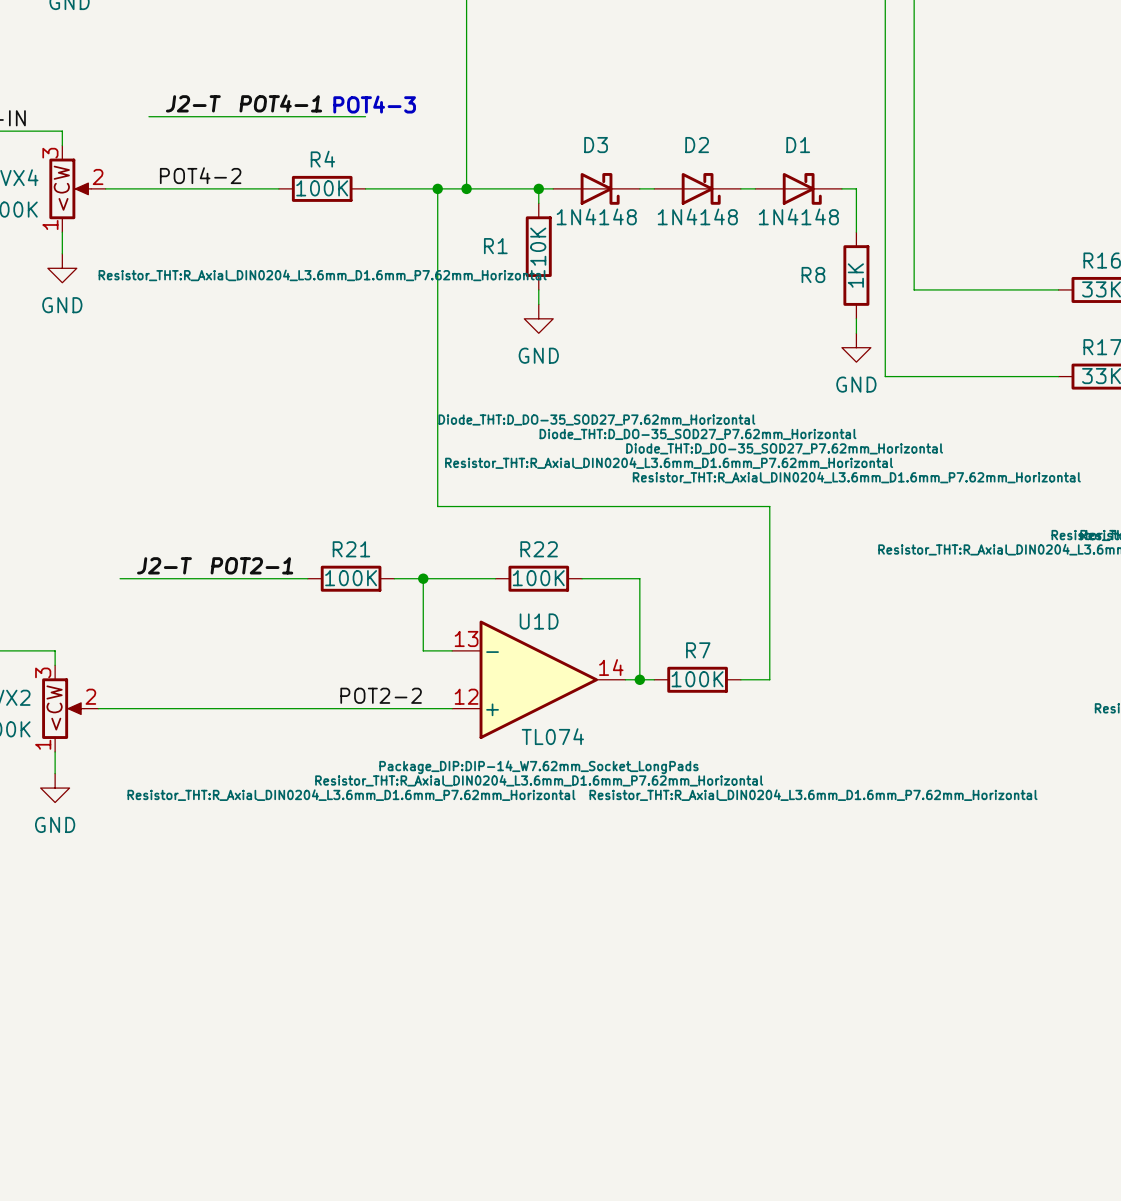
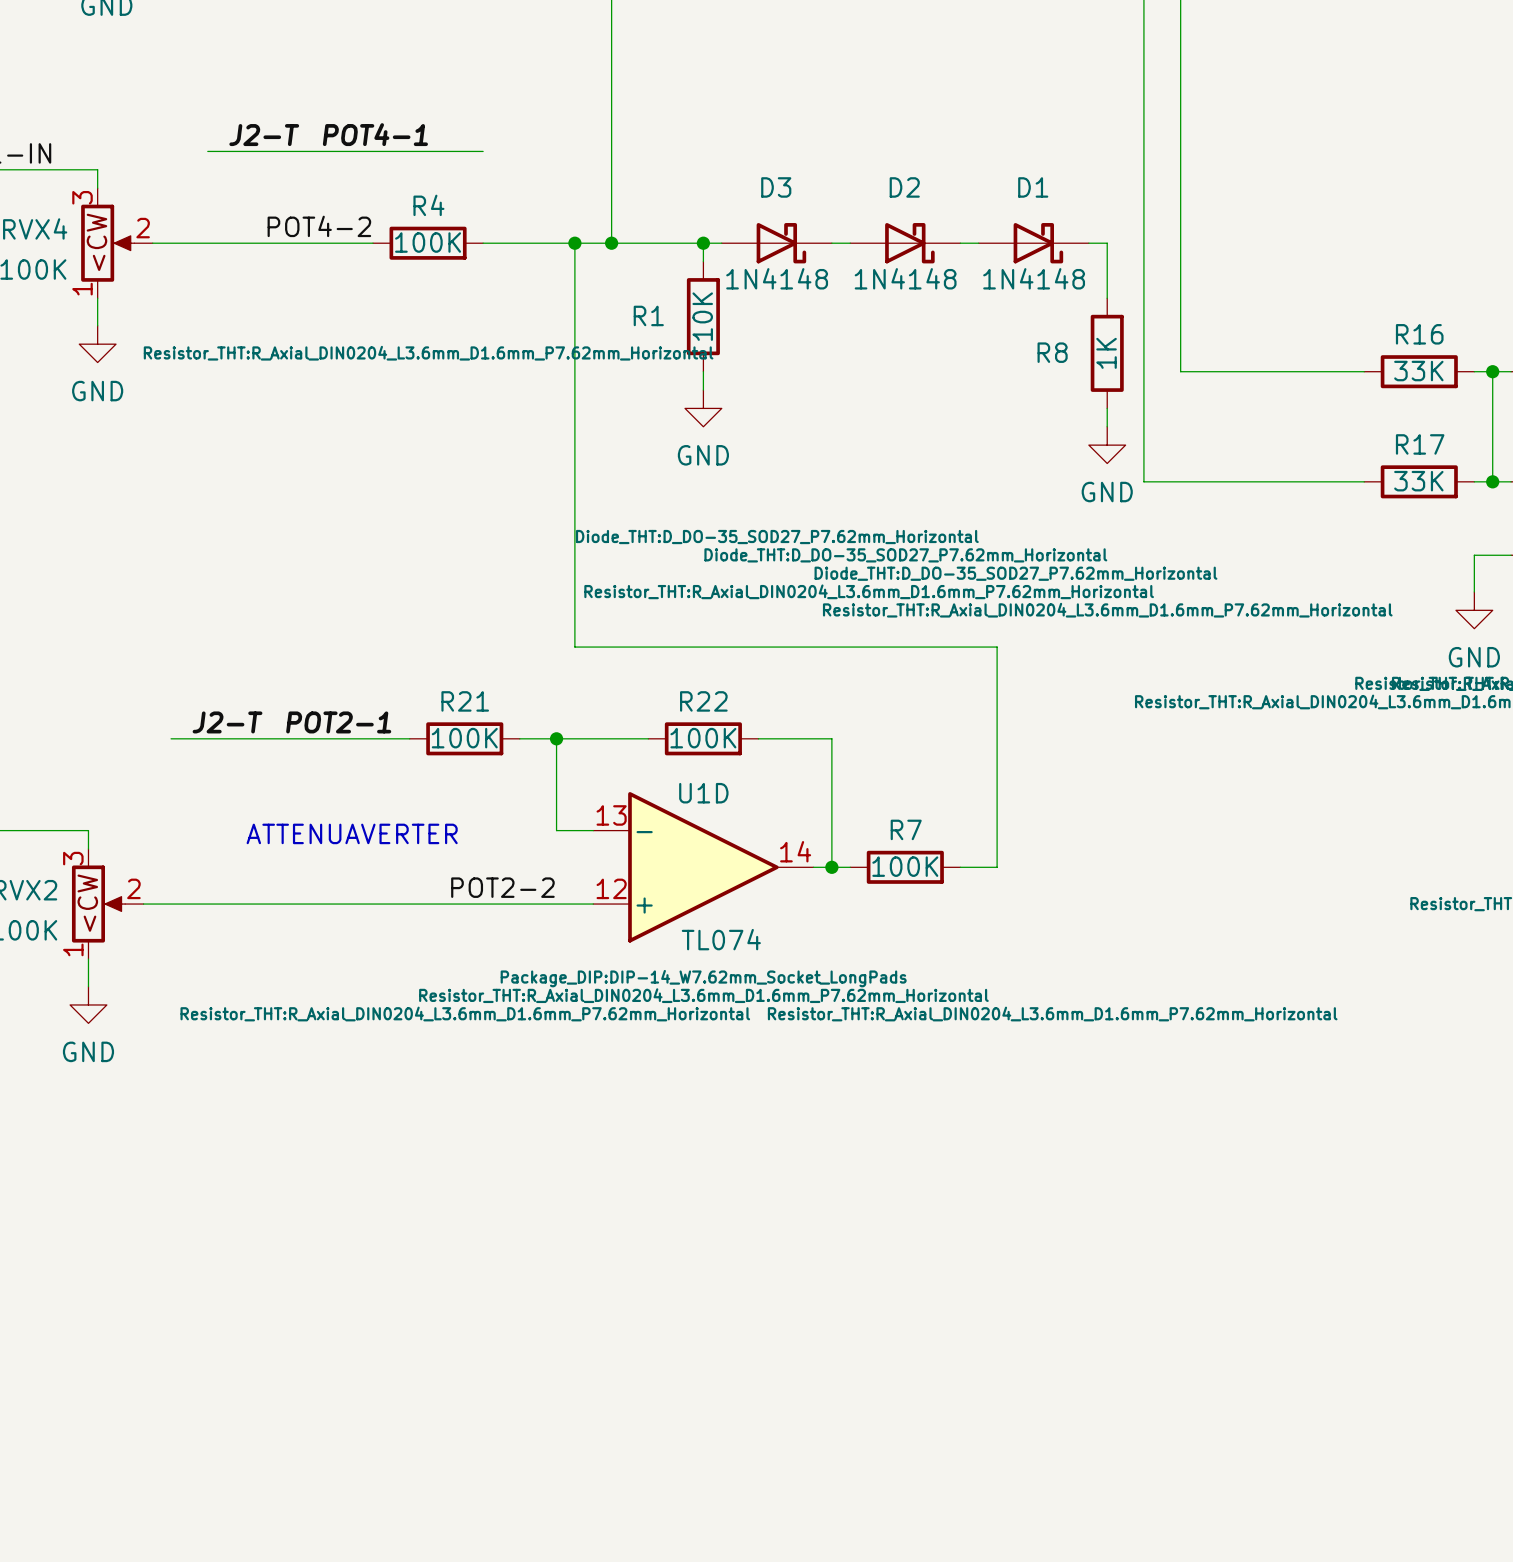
text: POT4-3 (374, 104) -> none
label position: POT4-2 (200, 175) -> POT4-2 (319, 226)
text: none -> ATTENUAVERTER (352, 833)

